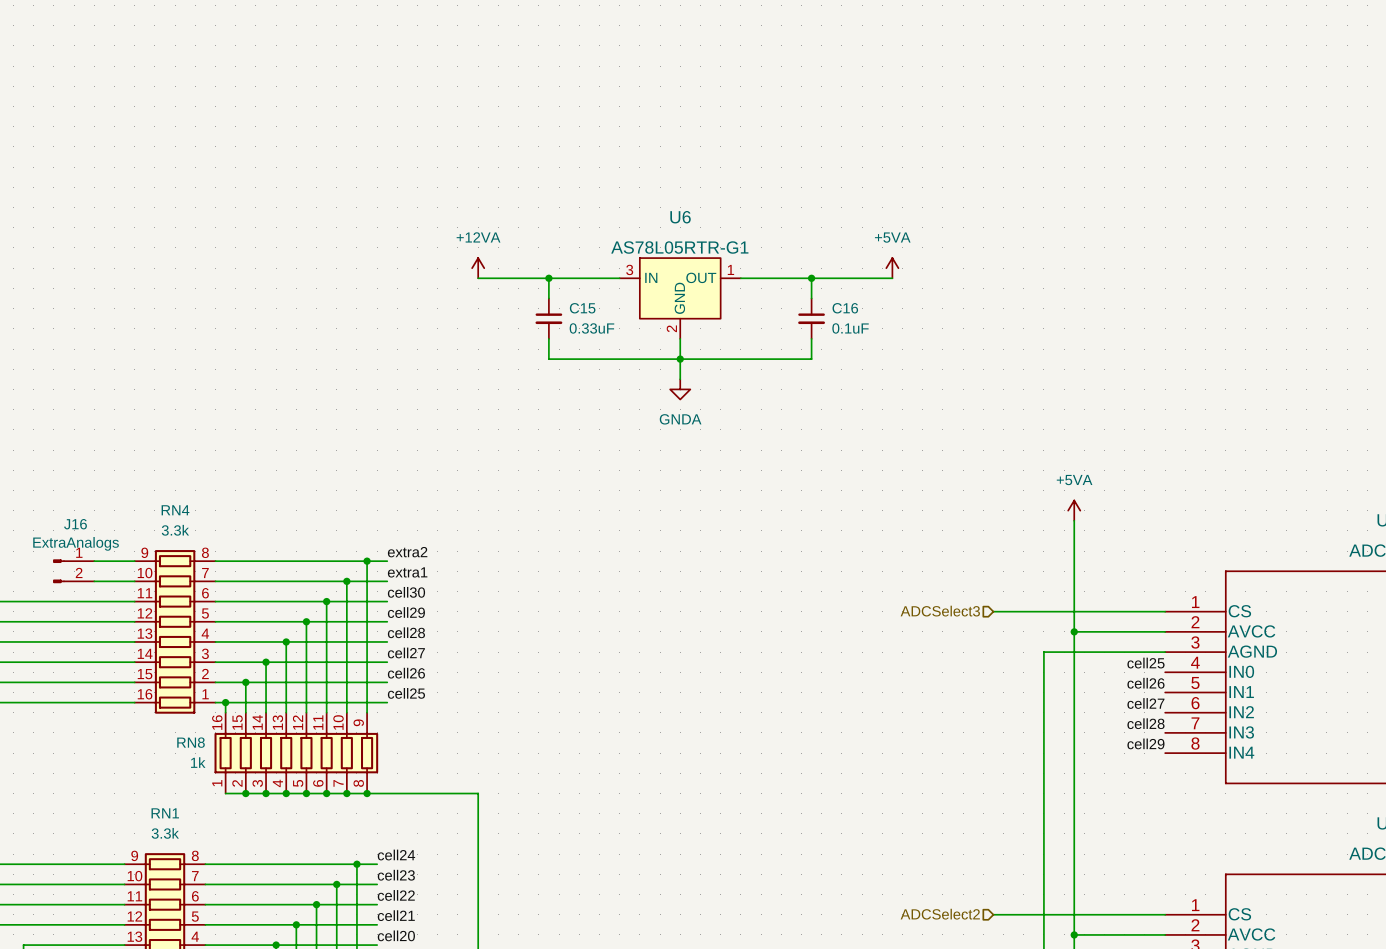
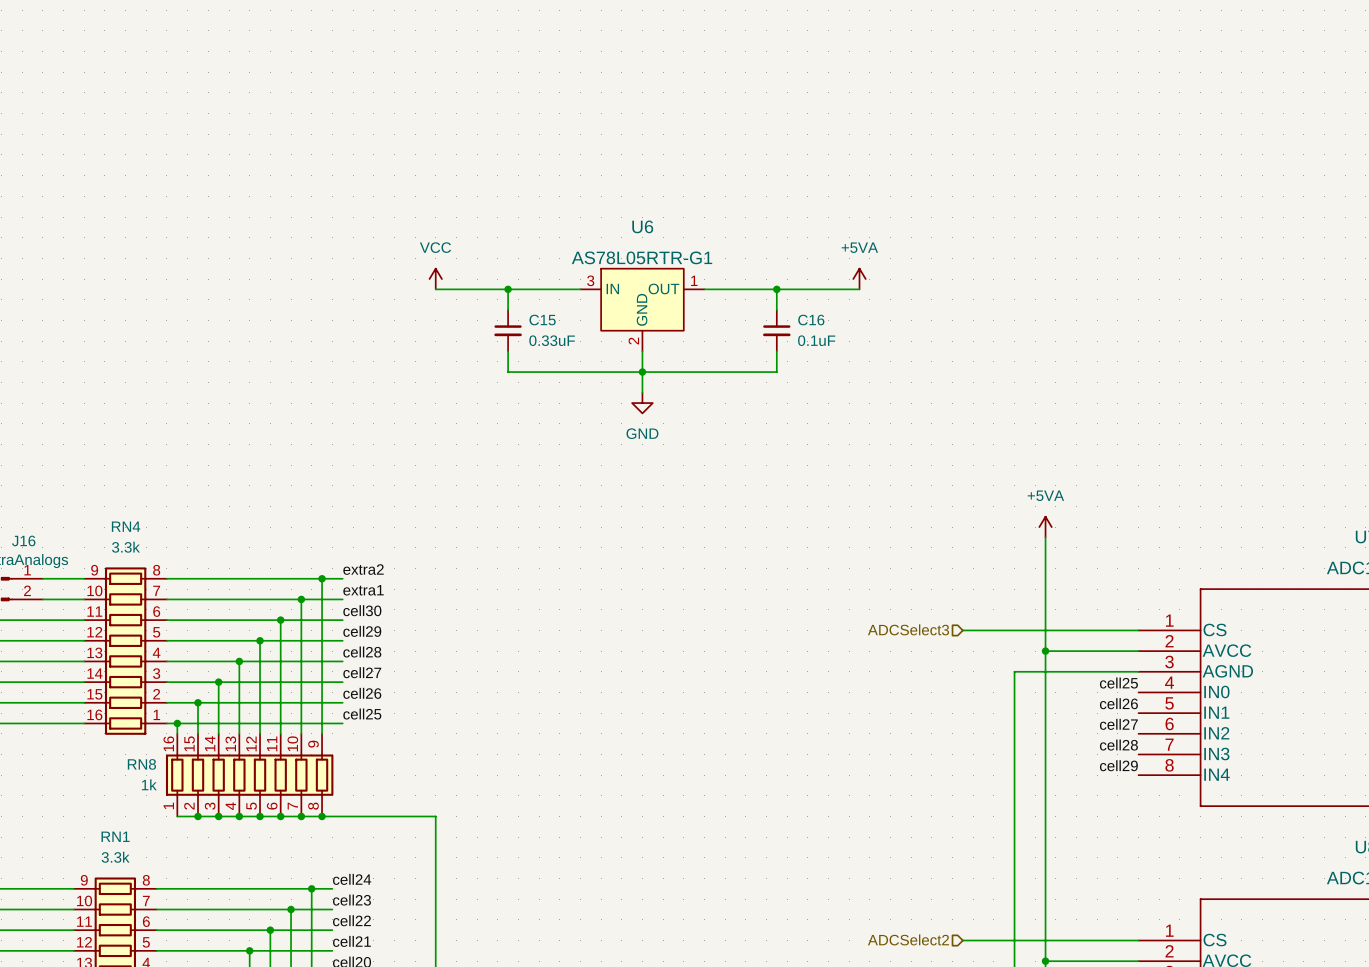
power symbol: +12VA (478, 268) -> VCC (435, 279)
power symbol: GNDA (680, 389) -> GND (642, 403)

